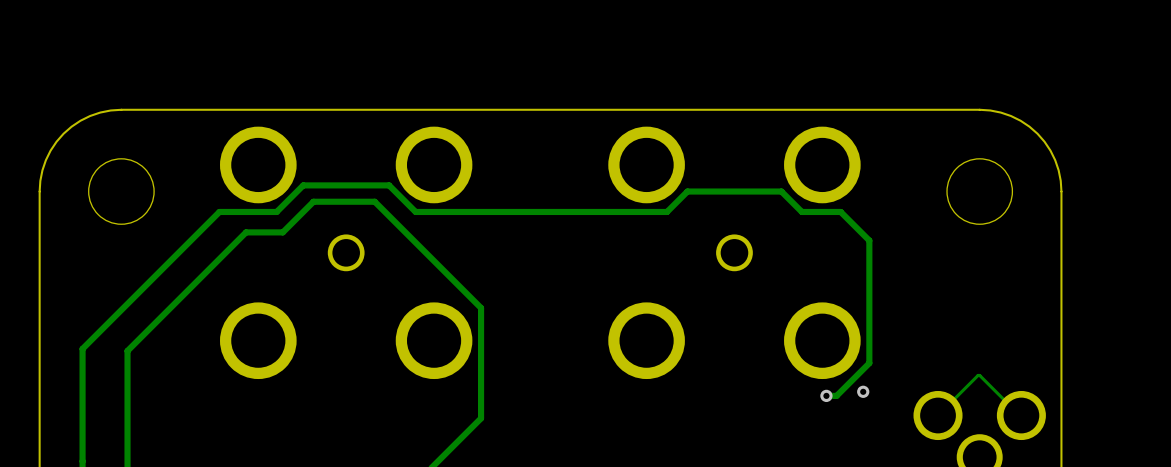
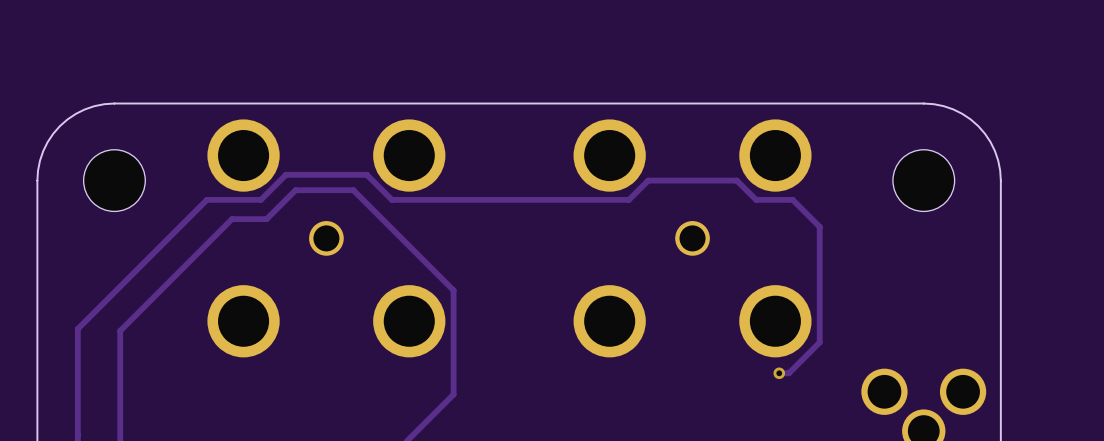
via: (863, 391) -> none
track: (1021, 415) (979, 375) (938, 415) -> none

